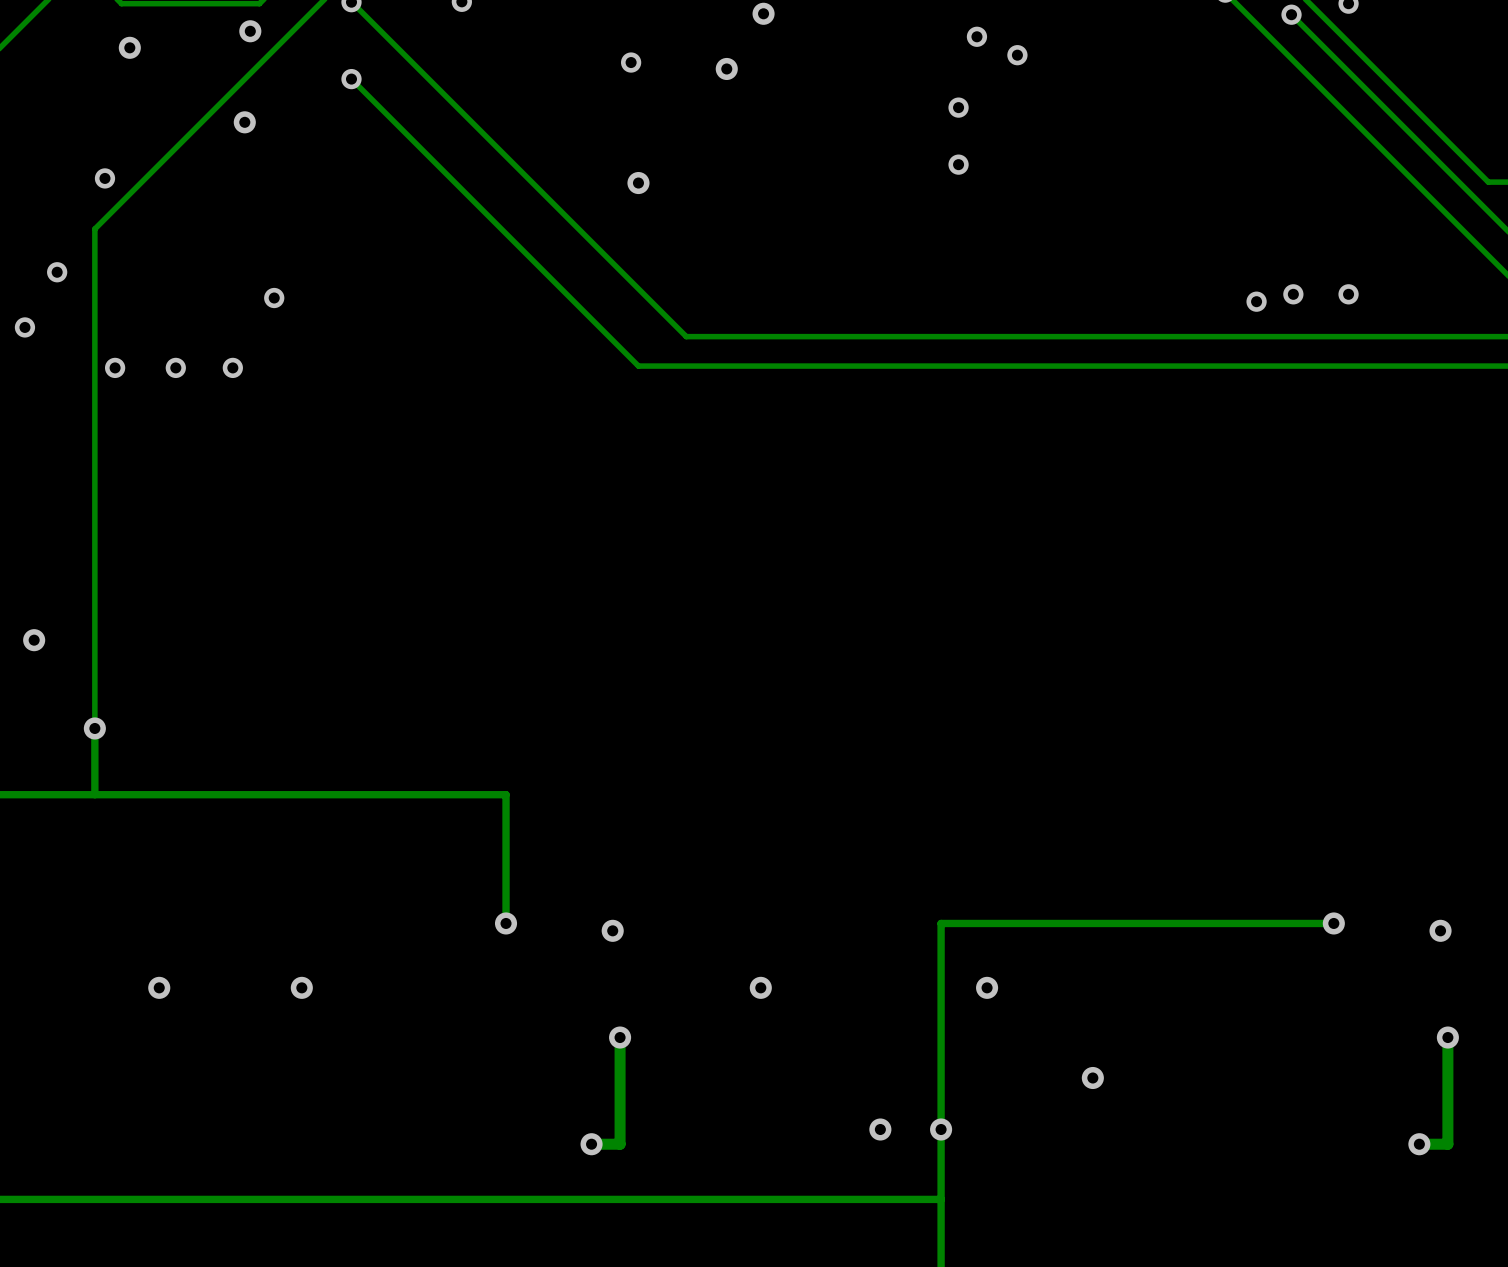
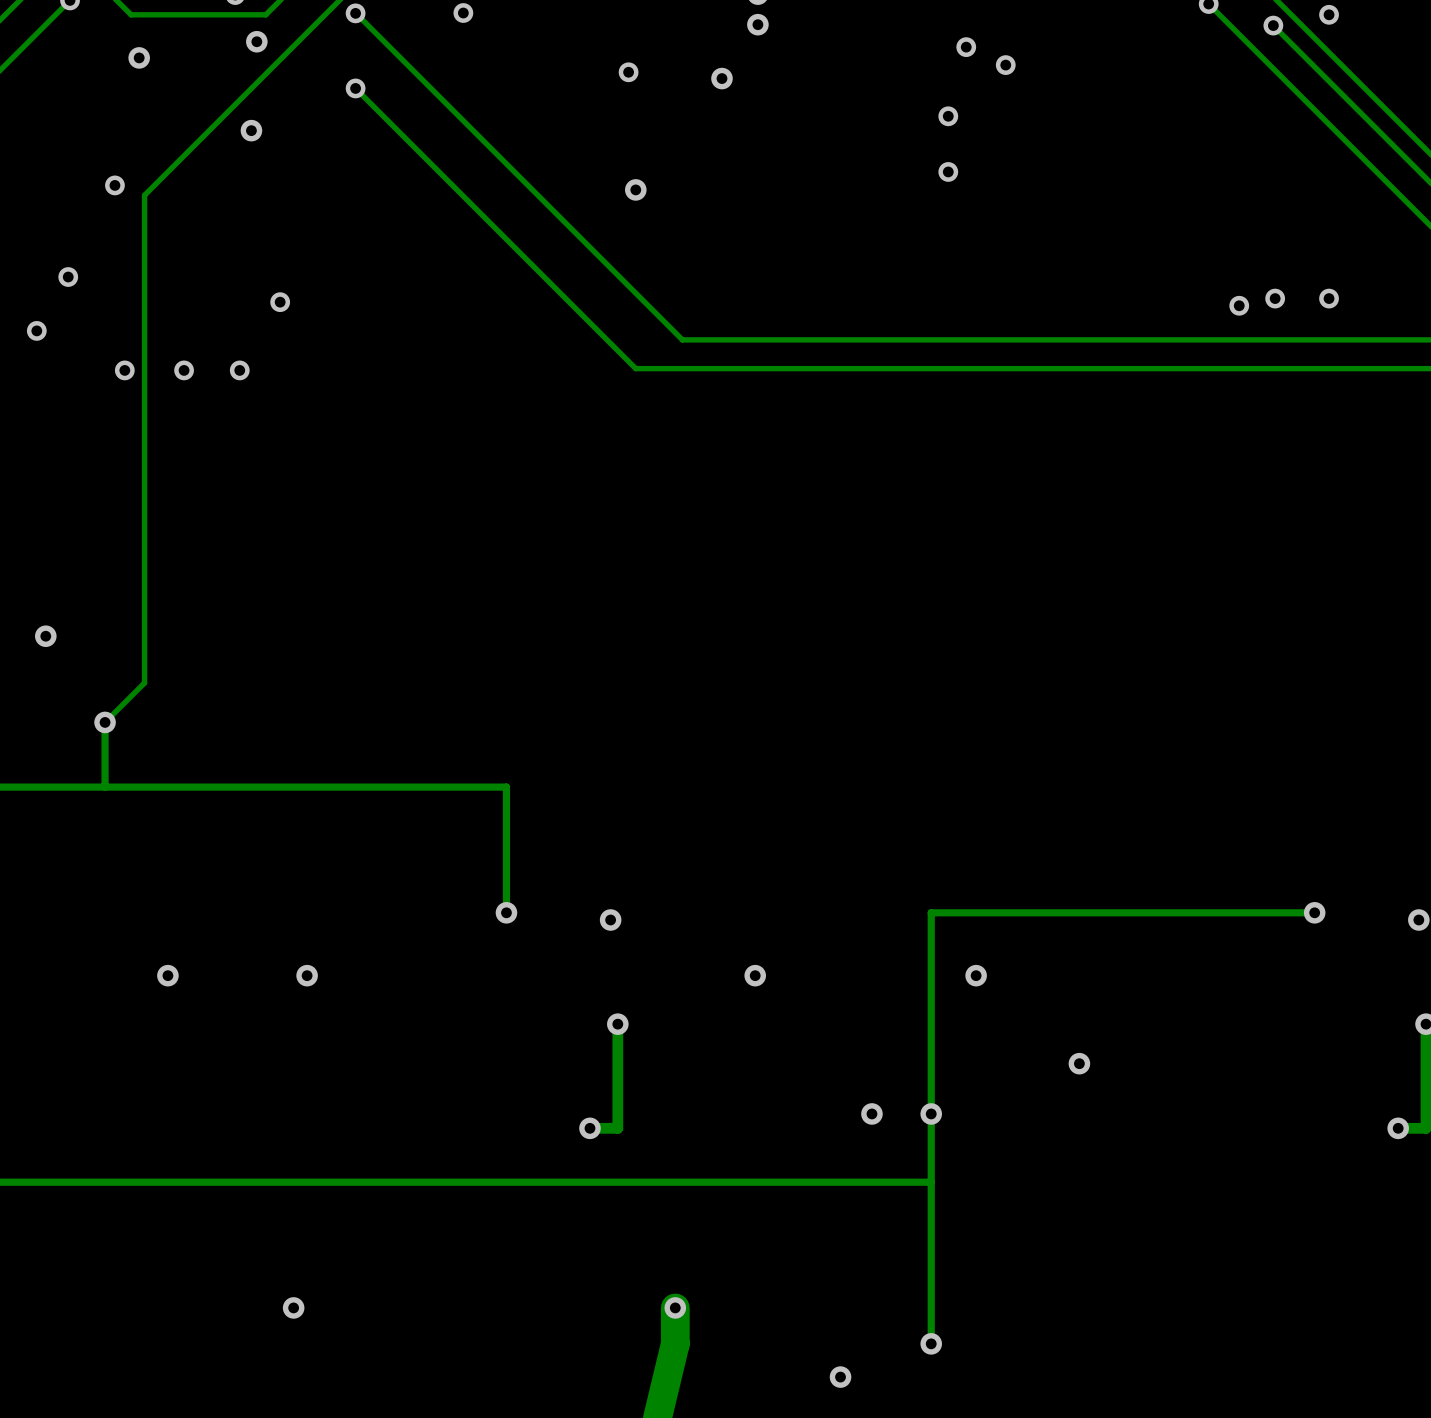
track: (135, 188) (94, 229) (94, 728) -> (144, 195) (144, 682) (105, 722)

